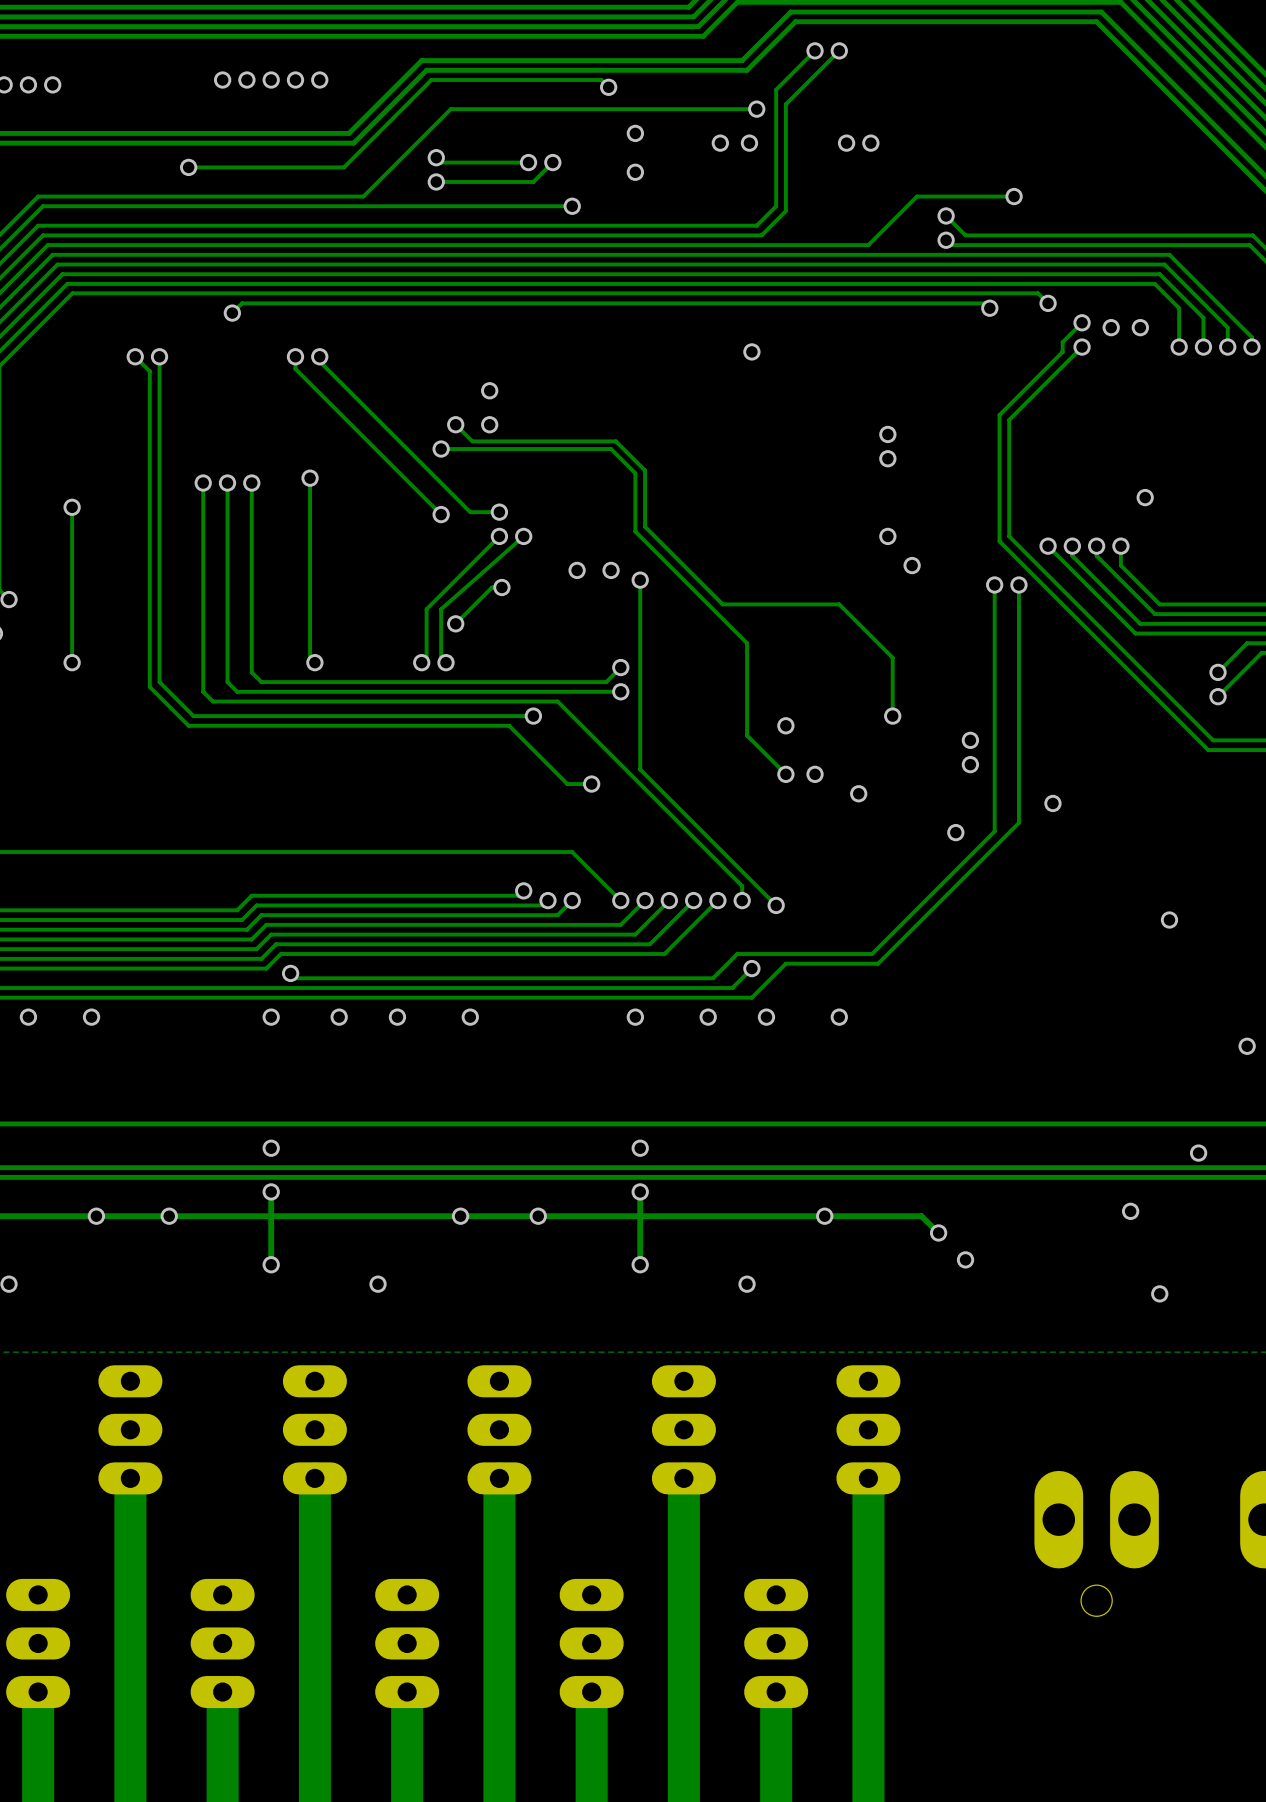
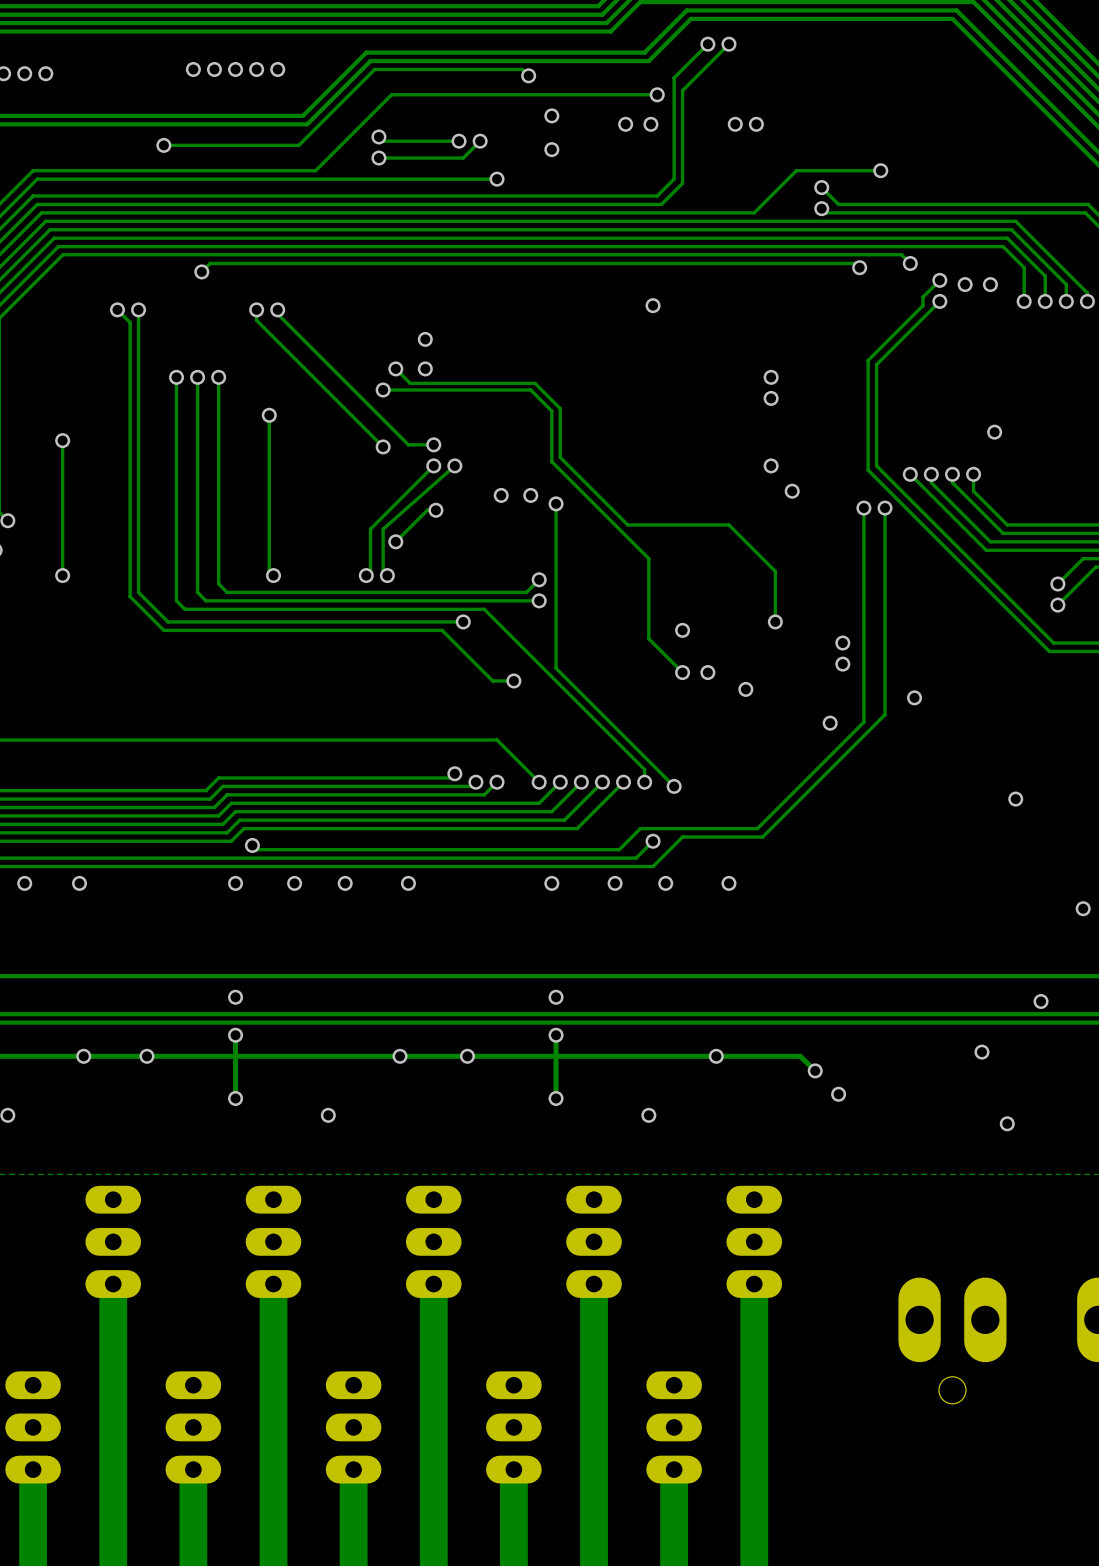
track: none -> (176, 377) (176, 419)
via: none -> (176, 377)
track: none -> (197, 377) (197, 419)
via: none -> (197, 377)
track: none -> (218, 377) (218, 419)
via: none -> (218, 377)
via: (203, 483) -> none
via: (227, 483) -> none
via: (251, 483) -> none

